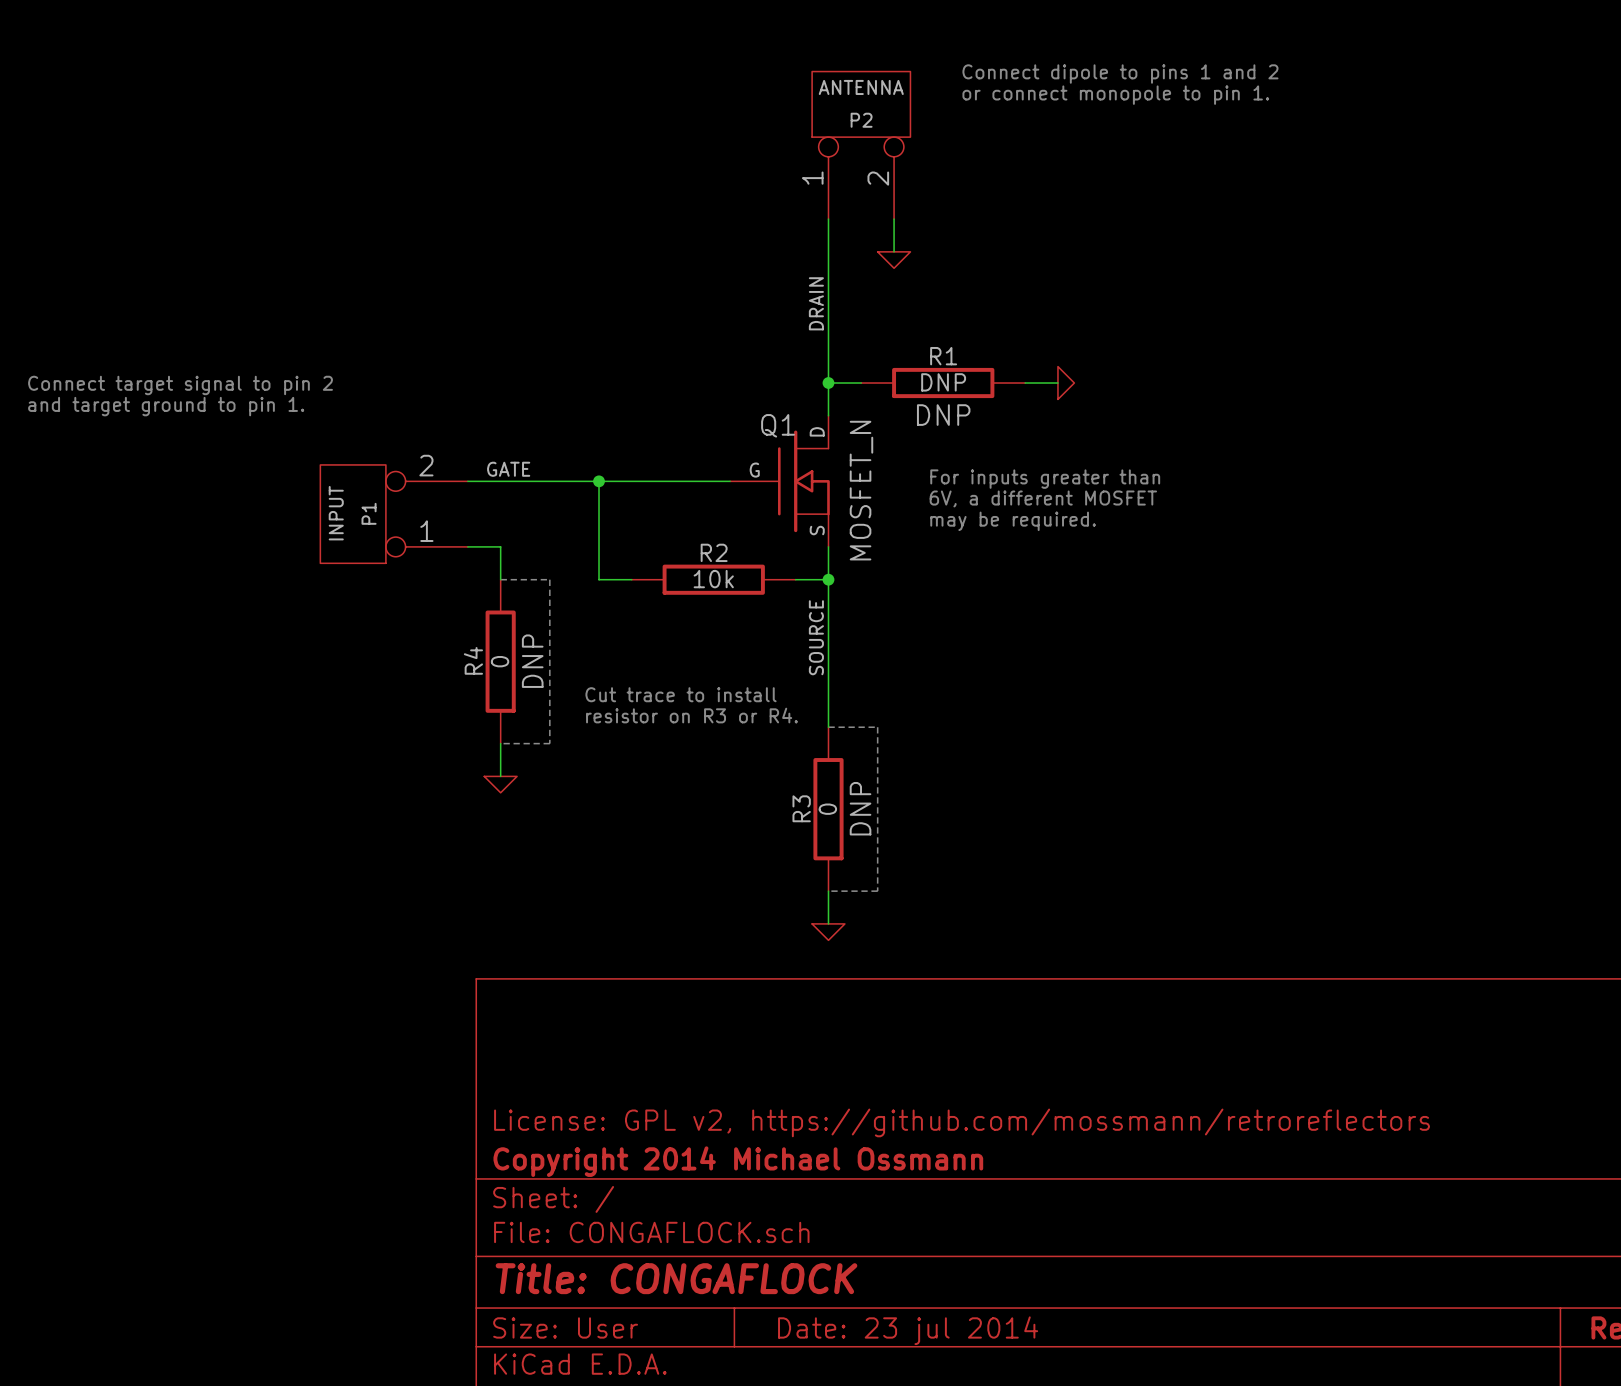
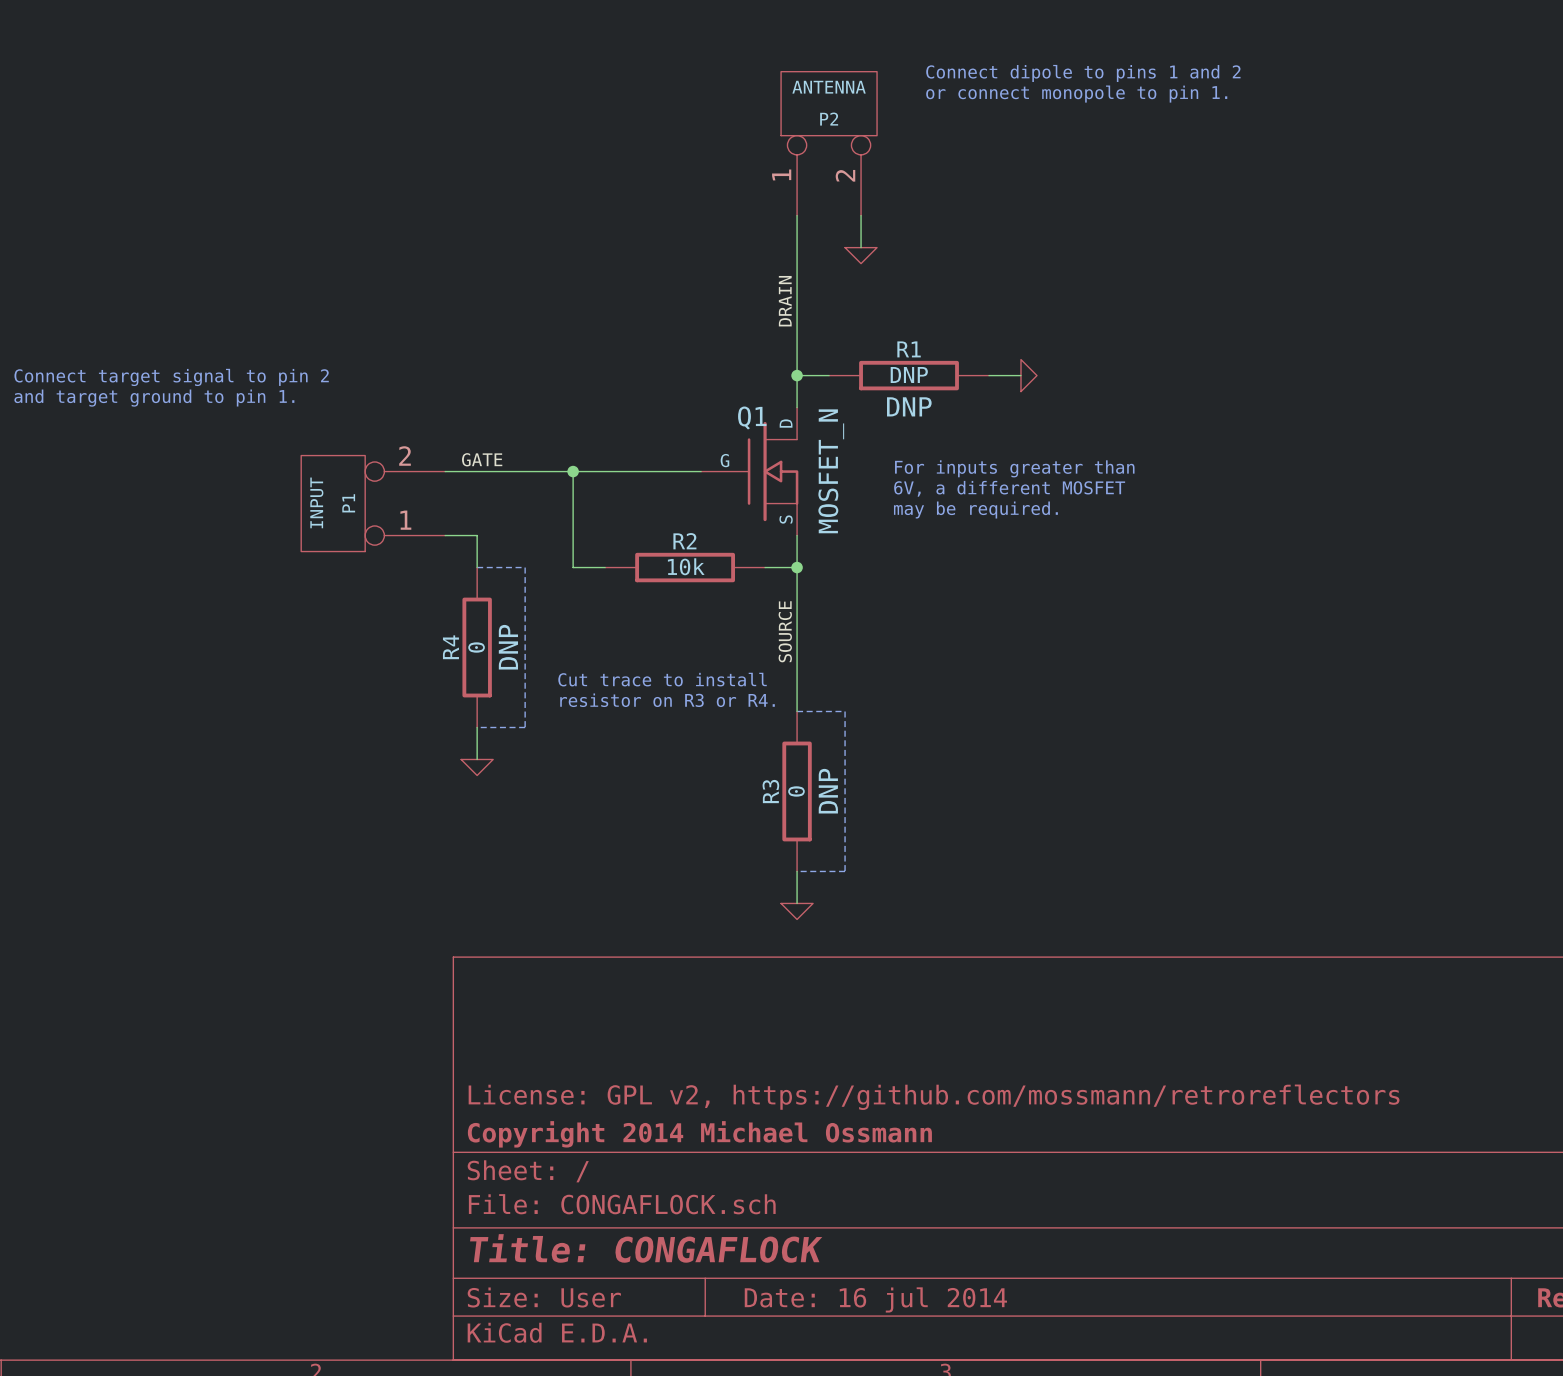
title block: Date: 23 jul 2014 (908, 1330) -> Date: 16 jul 2014 (875, 1299)

